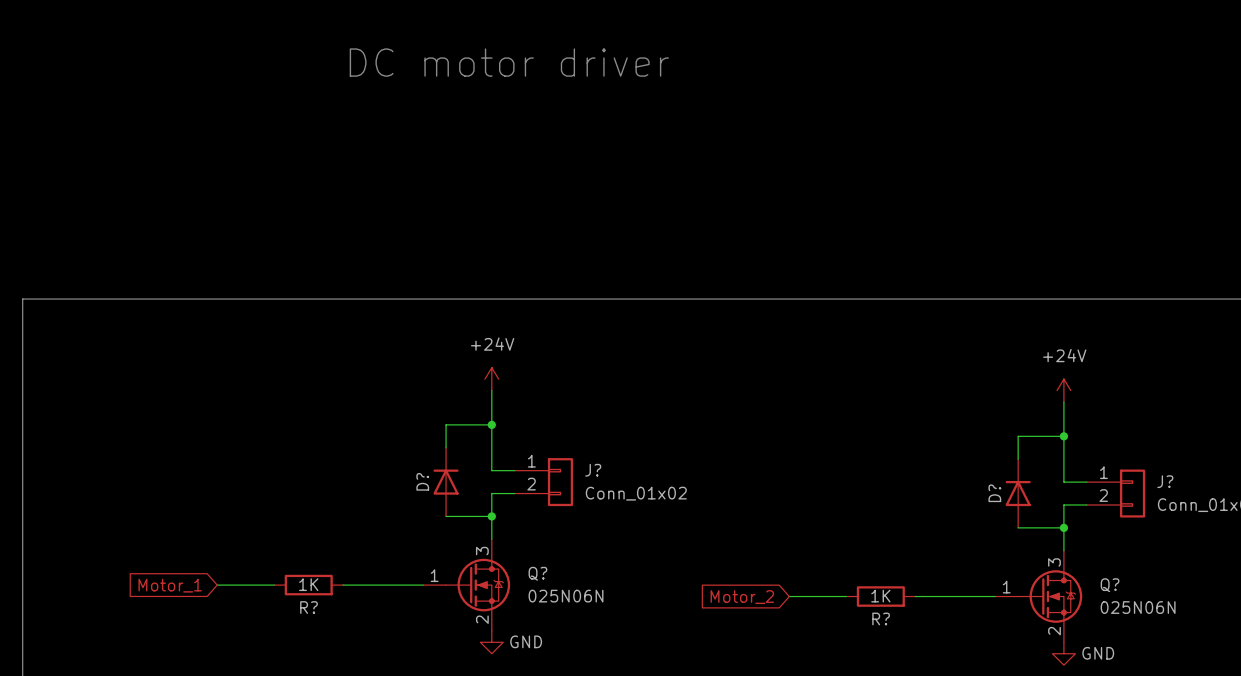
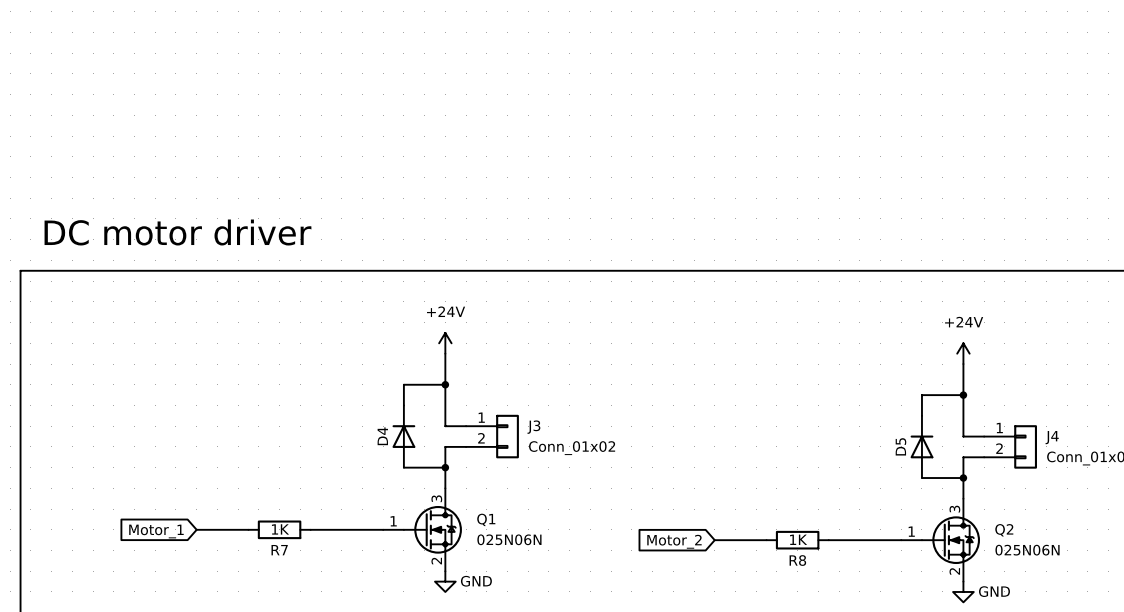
text: DC motor driver (509, 62) -> none
text: none -> DC motor driver (177, 232)
J? name: J? (593, 470) -> J3 (533, 427)
D? name: D? (422, 481) -> D4 (382, 436)
J? name: J? (1165, 481) -> J4 (1052, 437)
D? name: D? (994, 493) -> D5 (900, 446)
Q? name: Q? (537, 573) -> Q1 (486, 519)
Q? name: Q? (1110, 585) -> Q2 (1004, 530)
R? name: R? (309, 607) -> R7 (279, 550)
R? name: R? (881, 618) -> R8 (797, 560)

